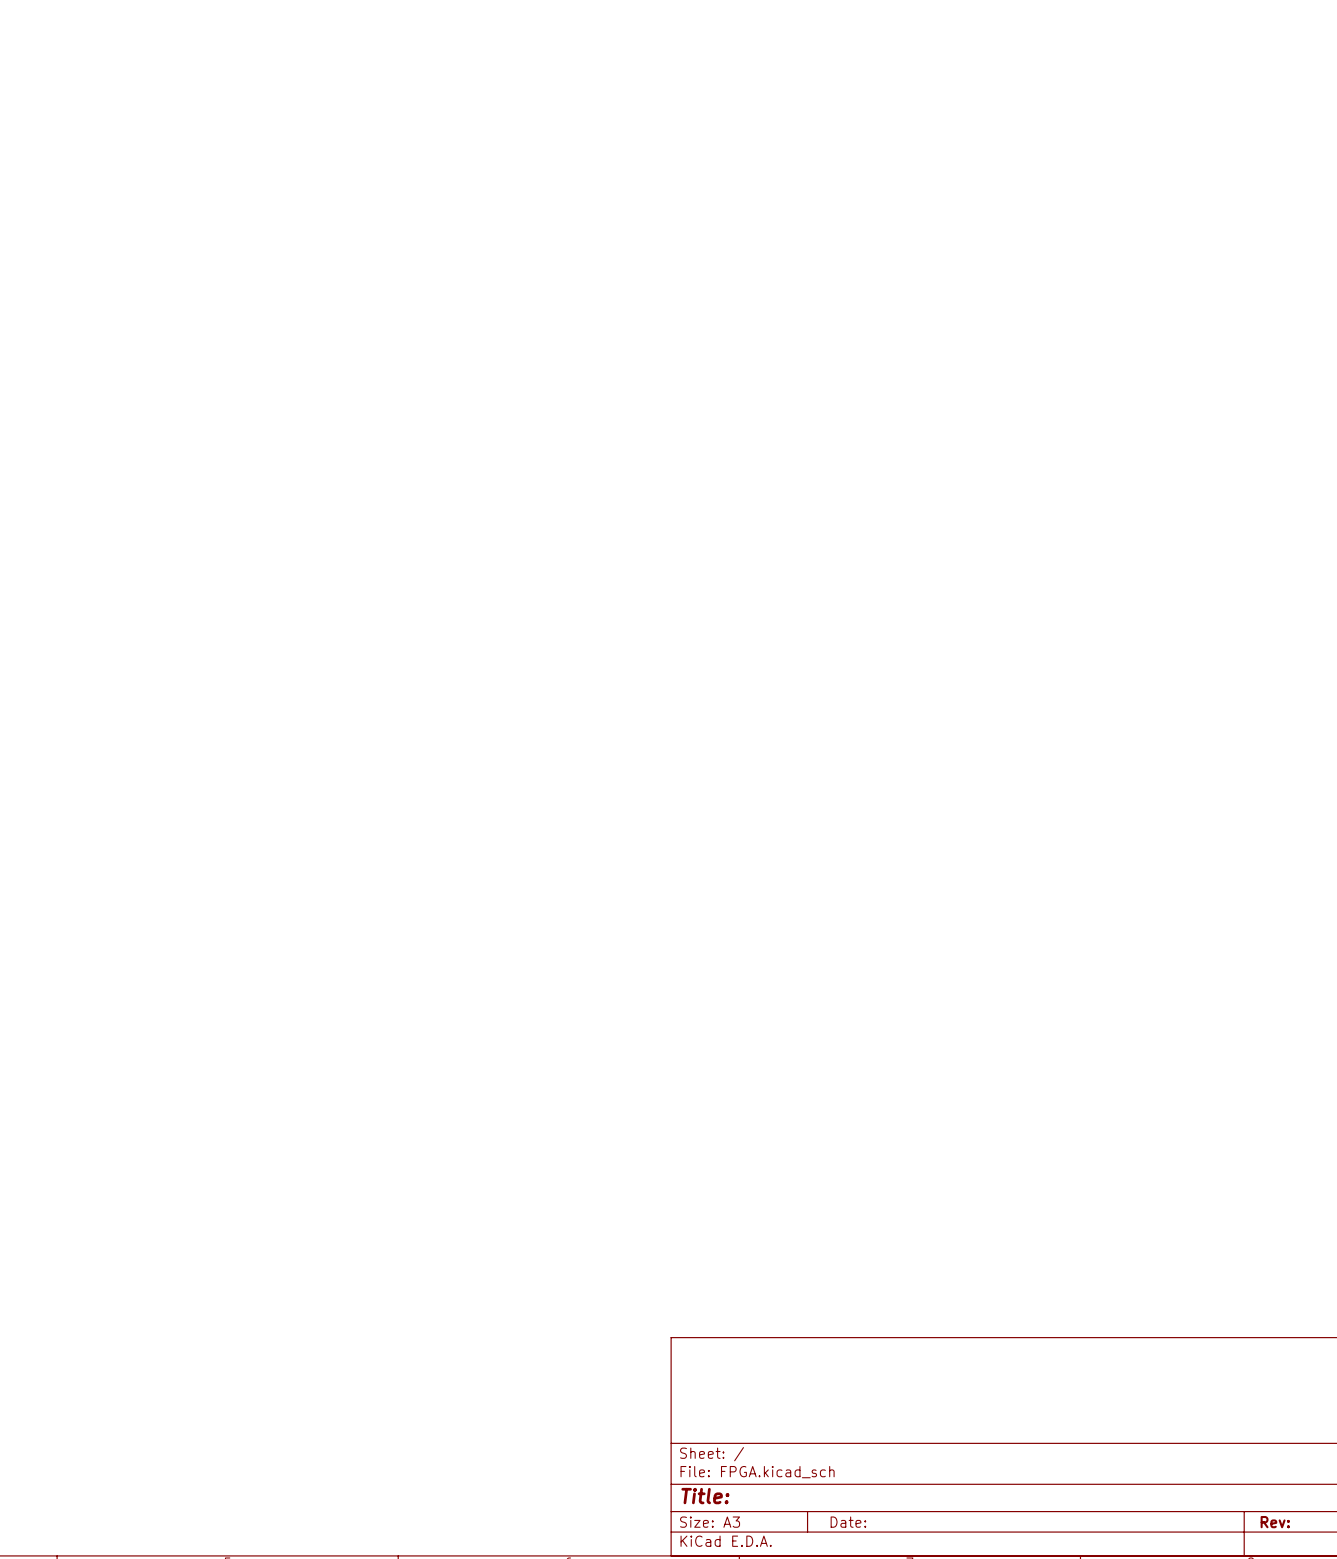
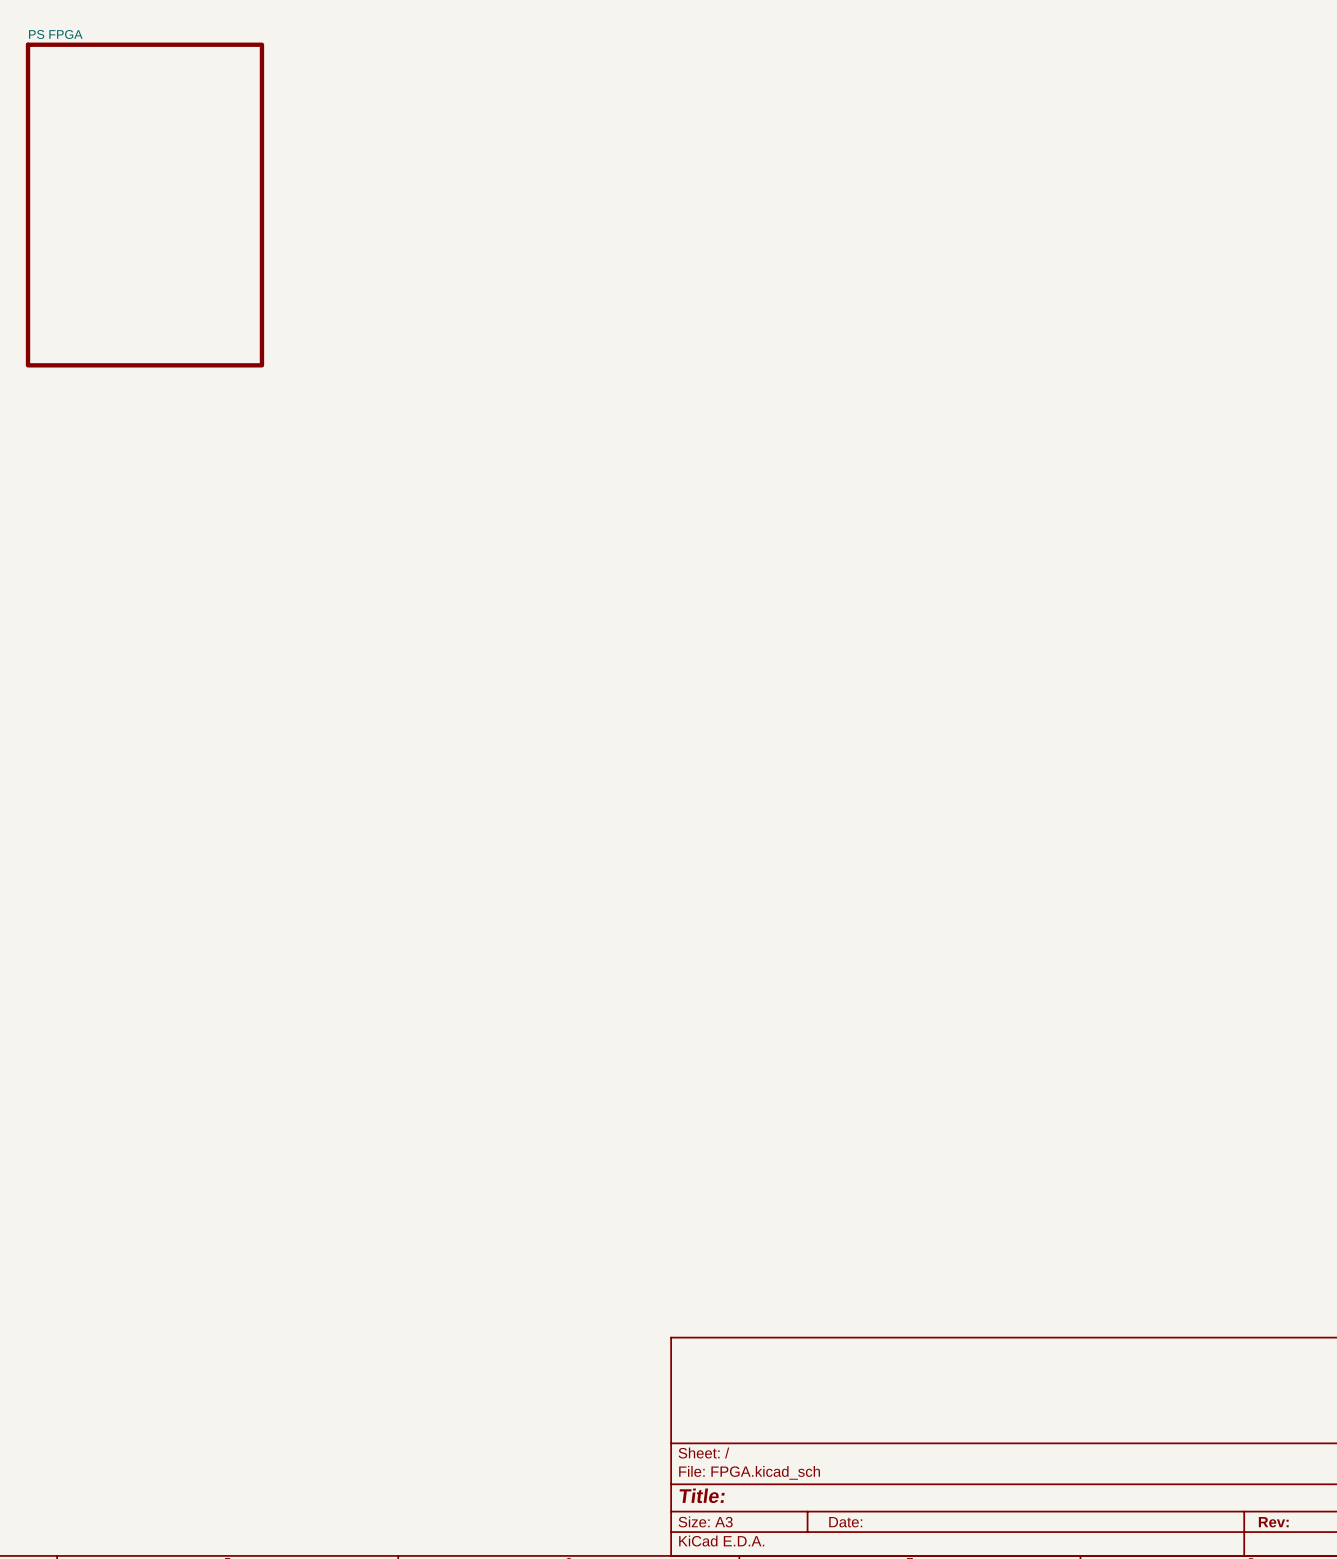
sheet PS FPGA: none -> (145, 205)

